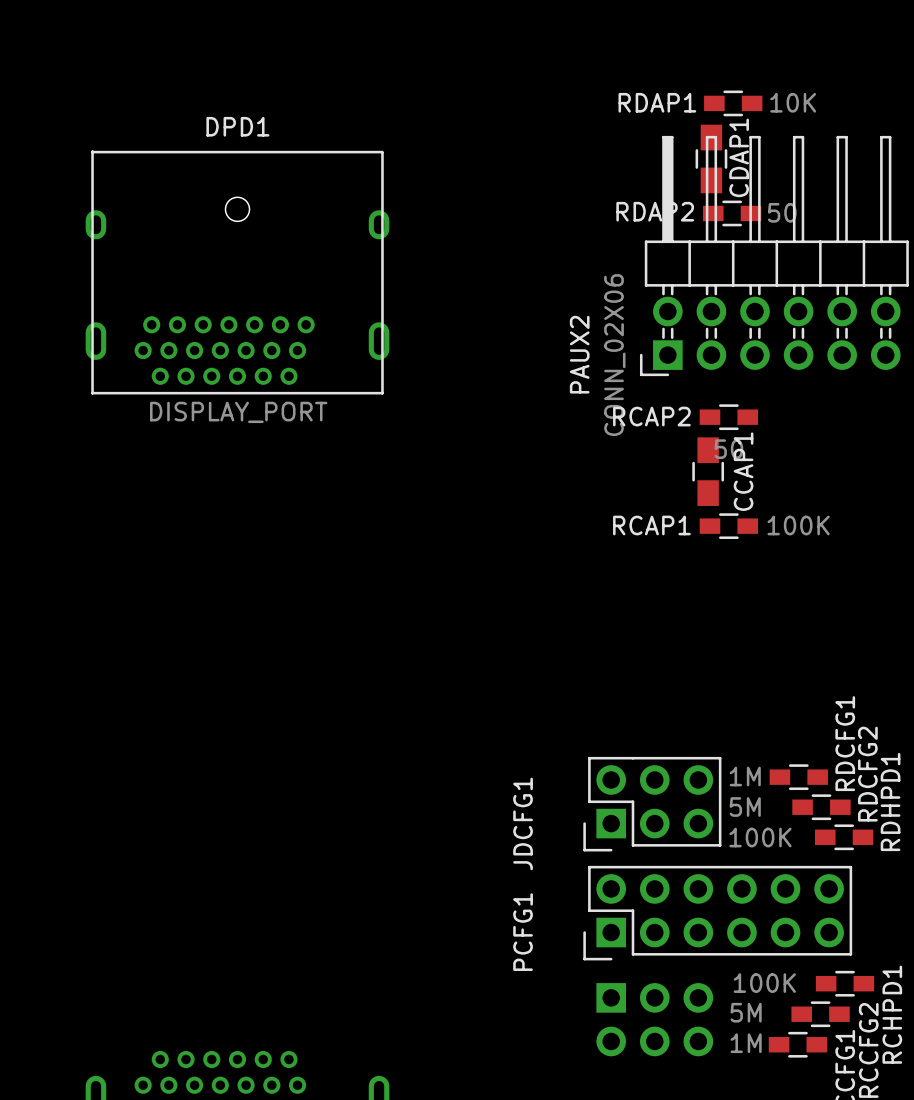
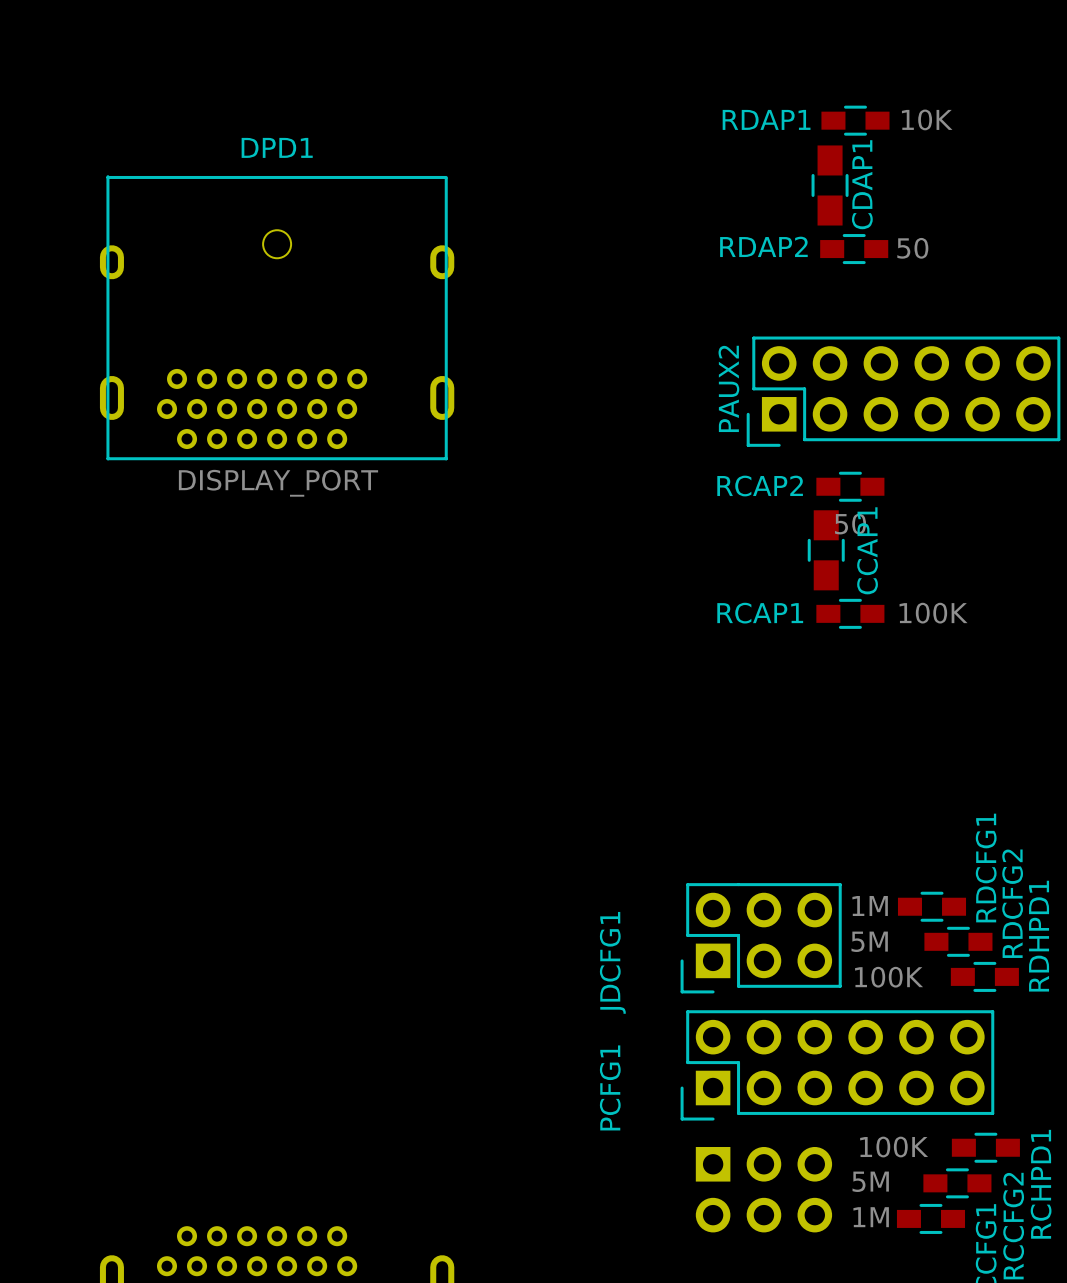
PAUX2 footprint: [639, 135, 909, 377] -> [746, 336, 1061, 447]
PAUX2 name position: PAUX2 (579, 354) -> PAUX2 (728, 388)
PAUX2 value: CONN_02X06 (614, 355) -> none

